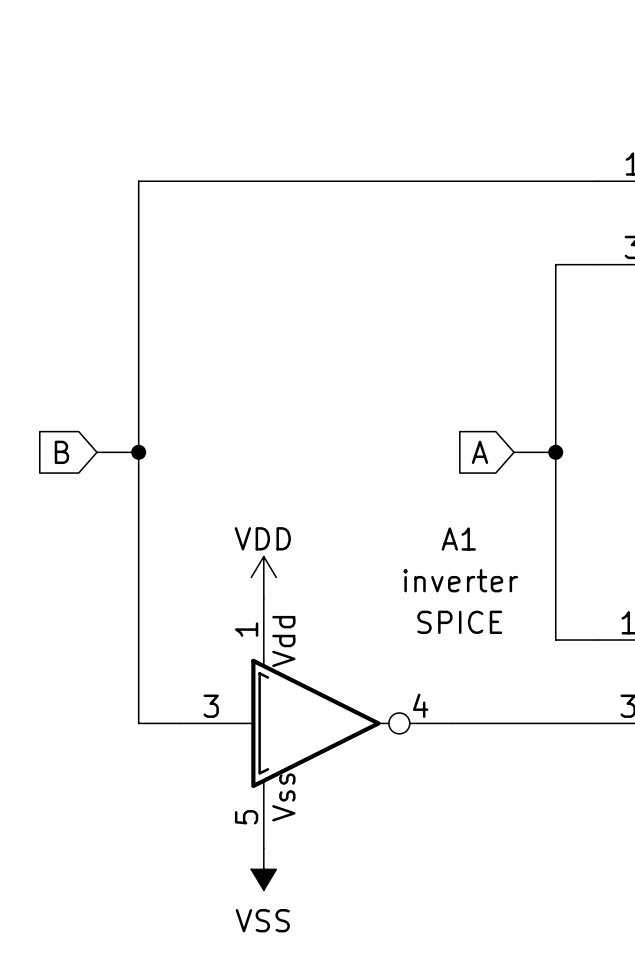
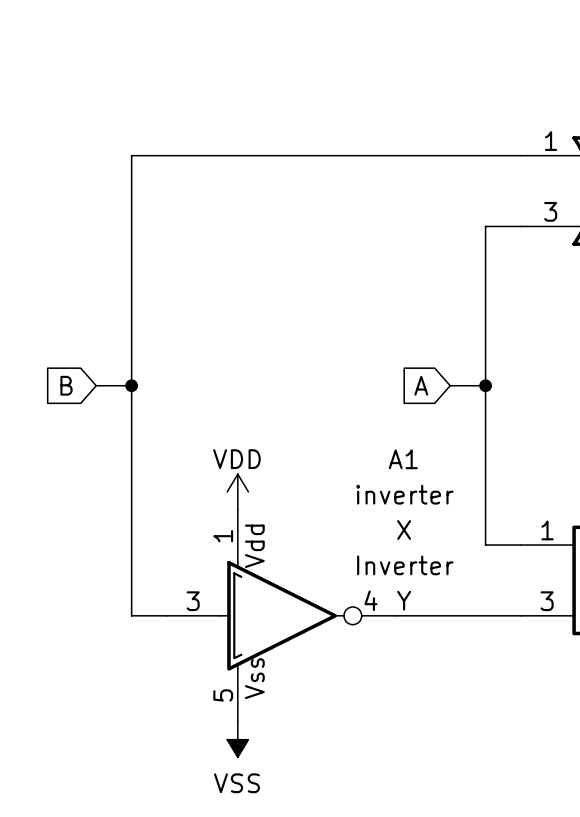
A1 text: SPICE (459, 622) -> none
A1 text: none -> X (404, 530)
A1 text: none -> Inverter (405, 565)
A1 text: none -> Y (404, 600)

